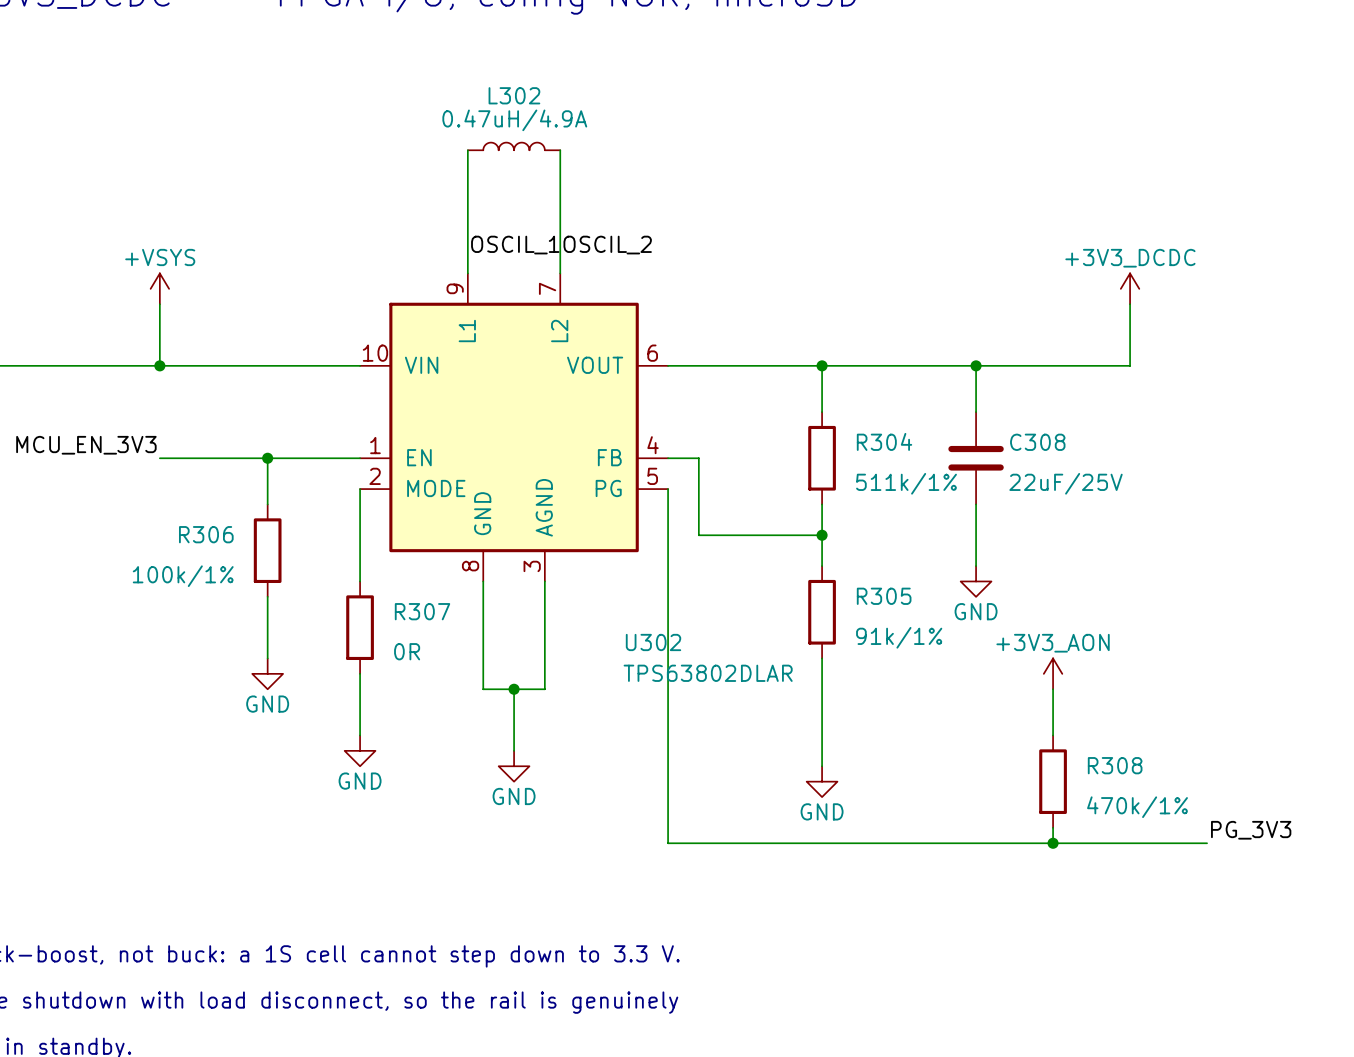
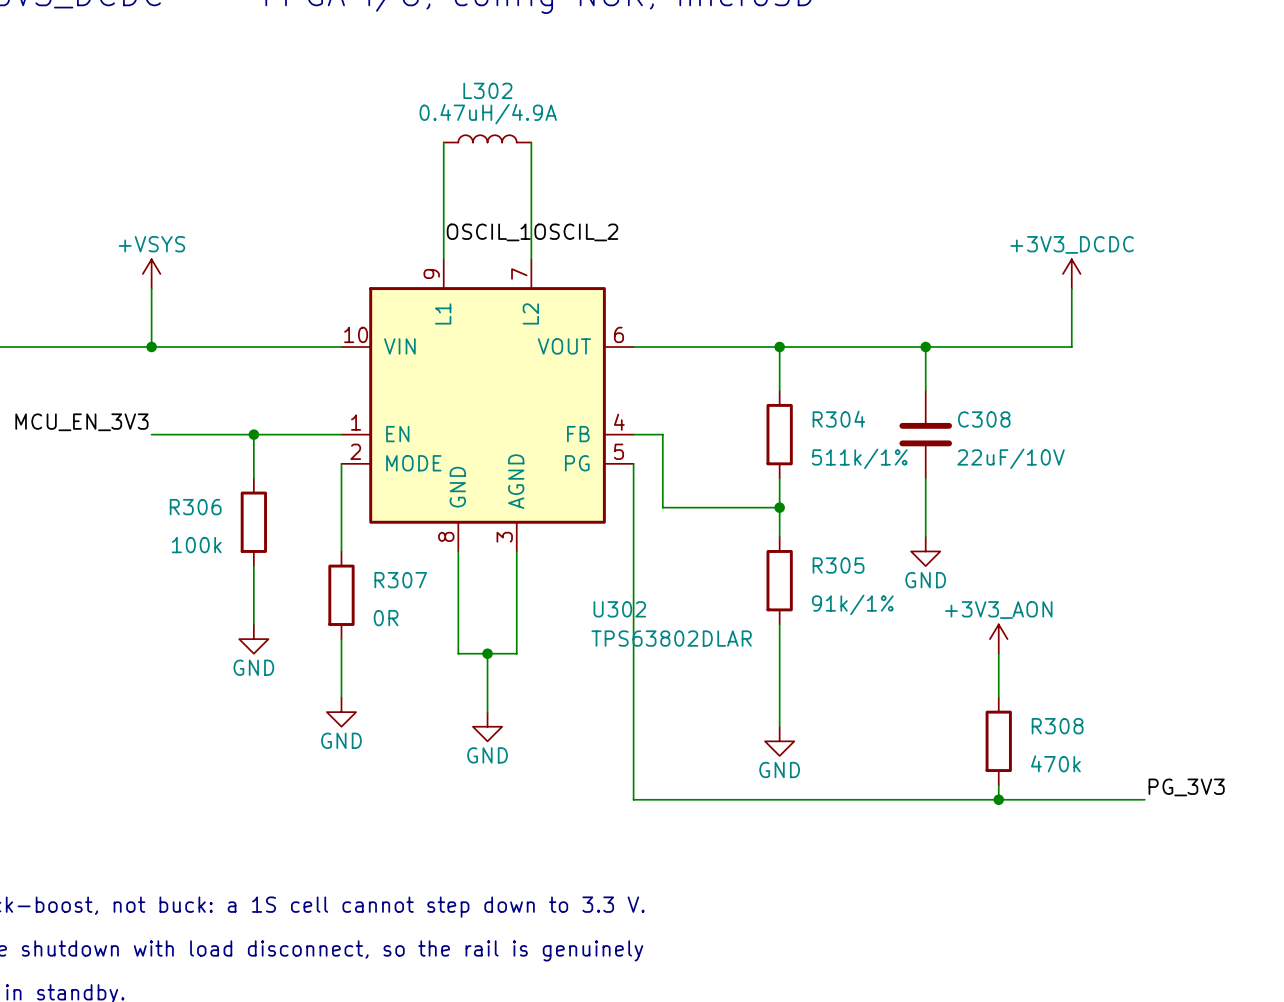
C308 value: 22uF/25V (1066, 483) -> 22uF/10V (1011, 458)
R306 value: 100k/1% (183, 576) -> 100k (196, 545)
R308 value: 470k/1% (1137, 807) -> 470k (1055, 763)

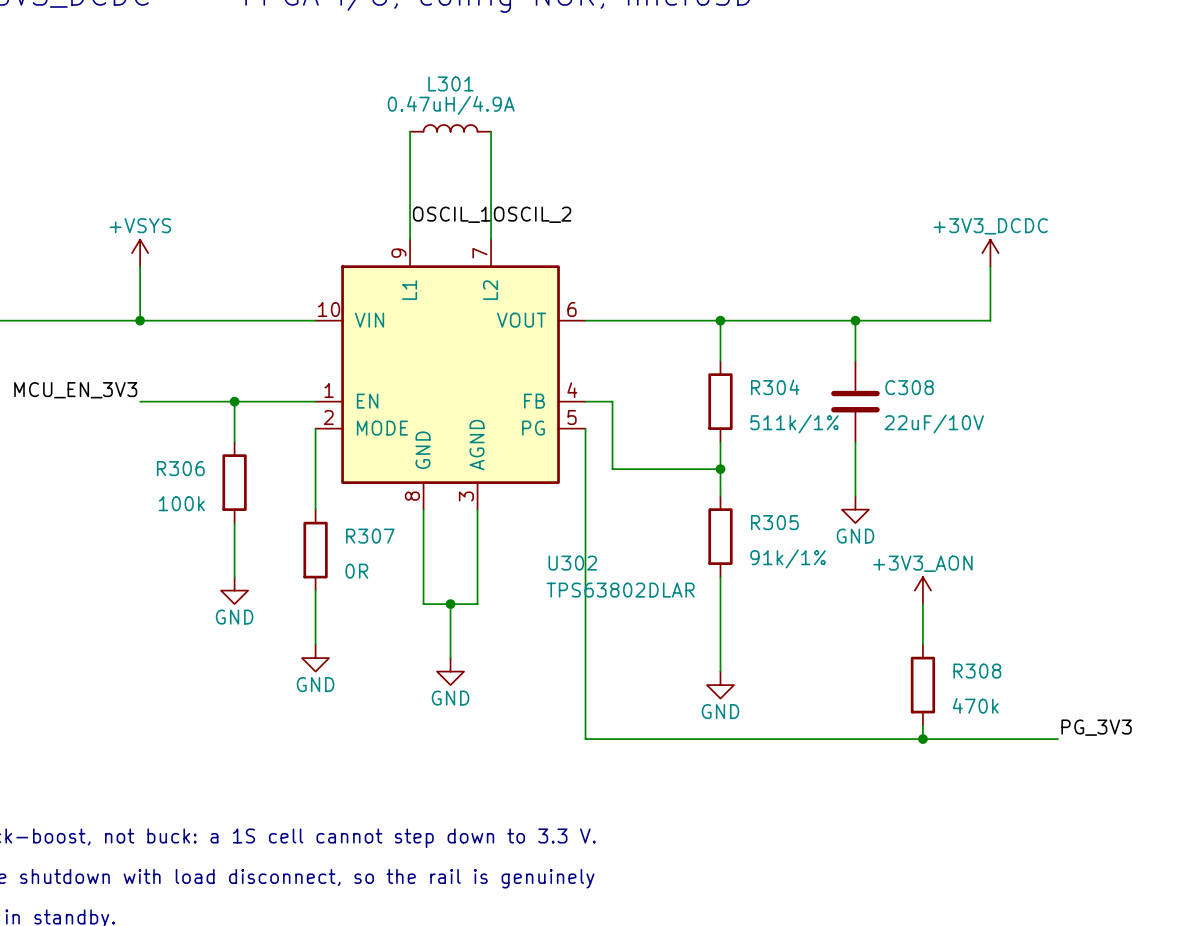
L302 name: L302 (487, 90) -> L301 (450, 83)

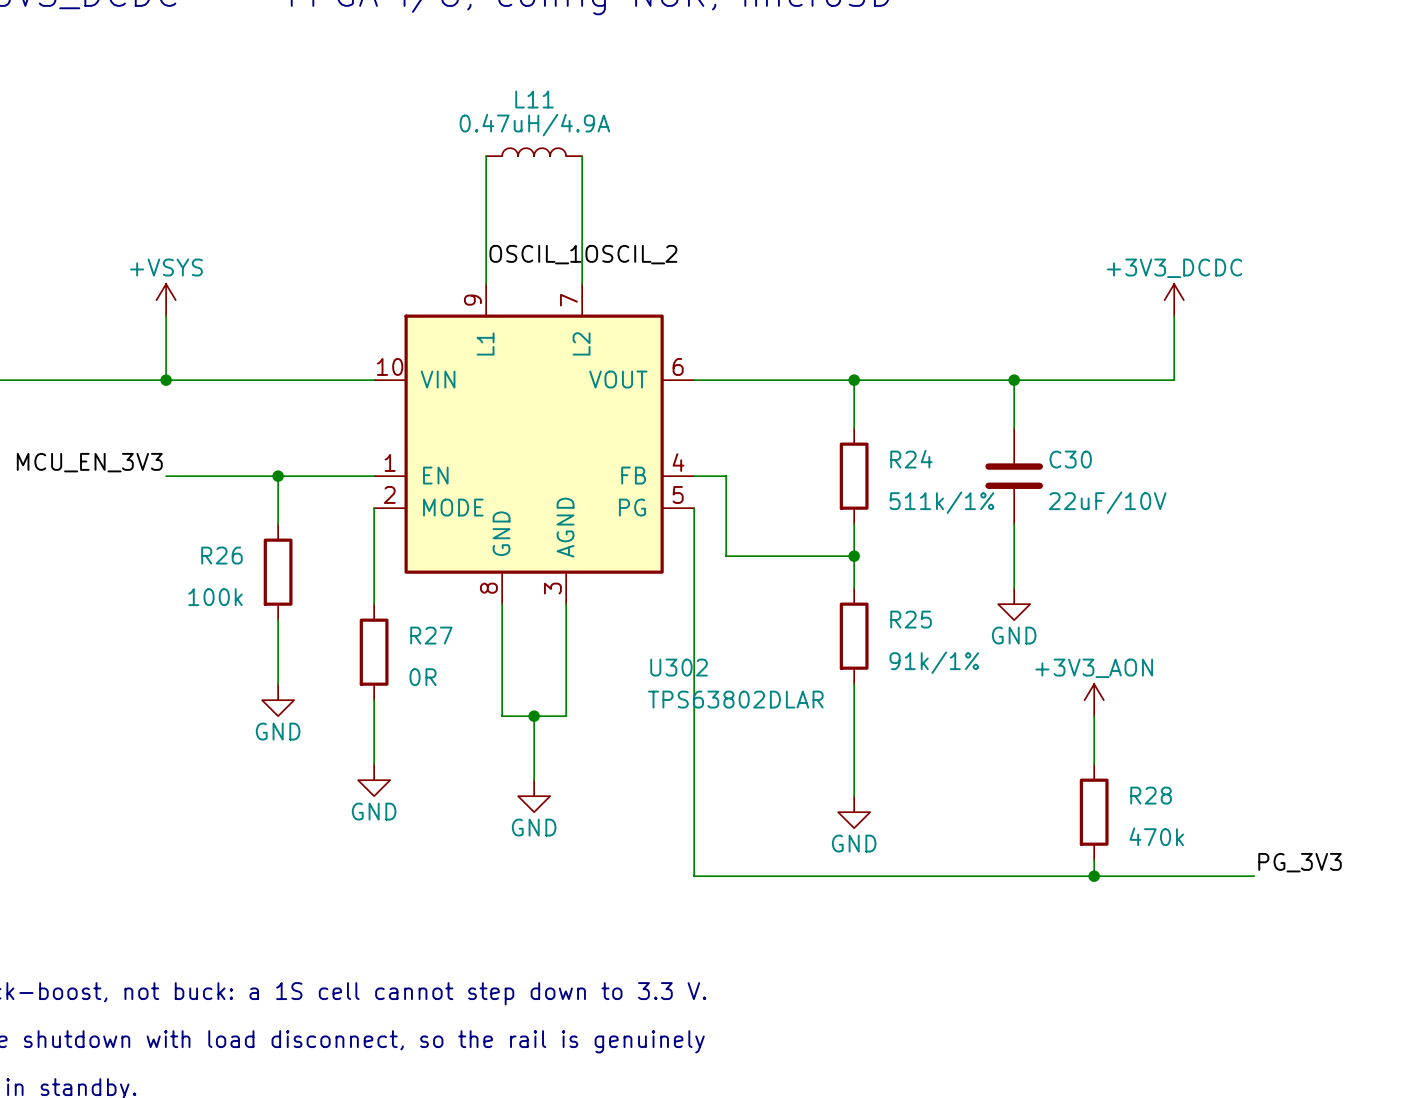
L301 name: L301 (450, 83) -> L11 (534, 99)
R304 name: R304 (775, 387) -> R24 (911, 459)
C308 name: C308 (909, 387) -> C30 (1070, 459)
R306 name: R306 (180, 468) -> R26 (221, 555)
R305 name: R305 (774, 522) -> R25 (911, 619)
R307 name: R307 (370, 536) -> R27 (431, 635)
R308 name: R308 (977, 671) -> R28 (1151, 795)

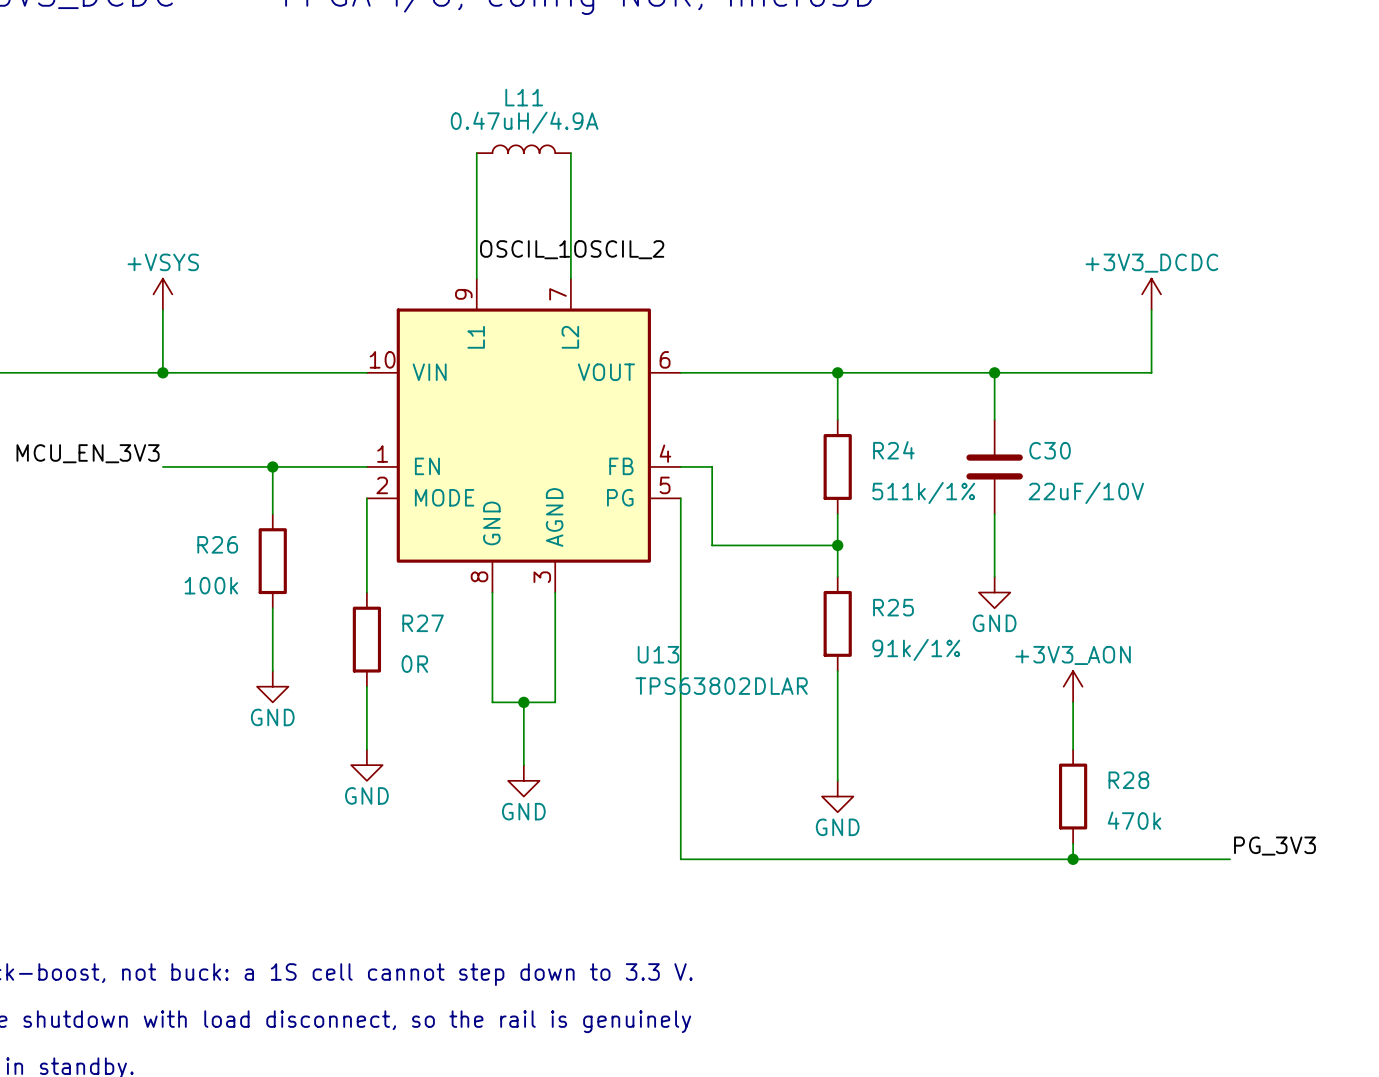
U302 name: U302 (679, 667) -> U13 (658, 654)

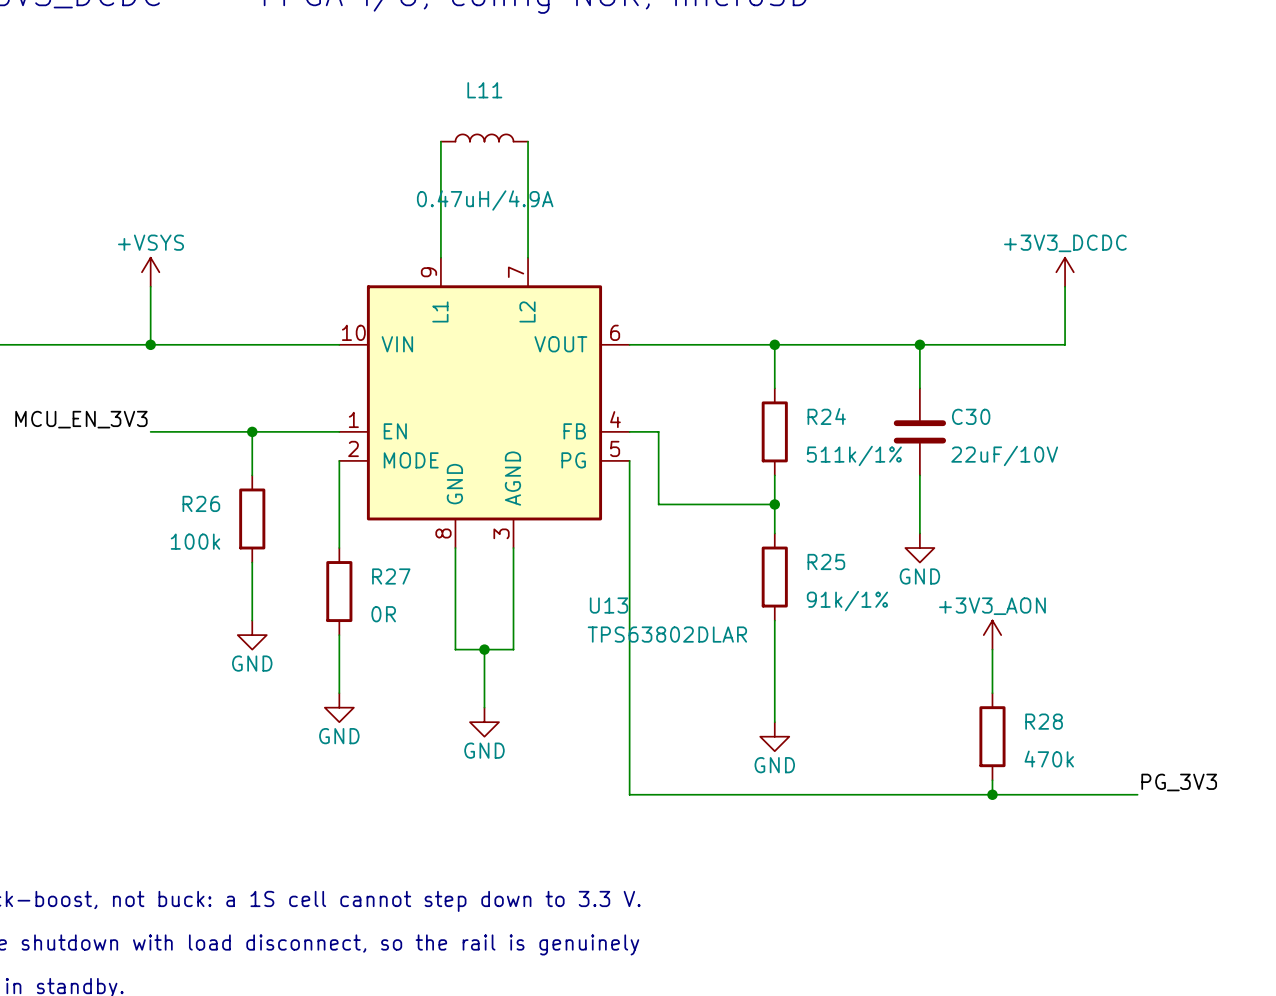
L11 value position: 0.47uH/4.9A (524, 122) -> 0.47uH/4.9A (485, 200)
label: OSCIL_1 (525, 249) -> none
label: OSCIL_2 (619, 249) -> none

